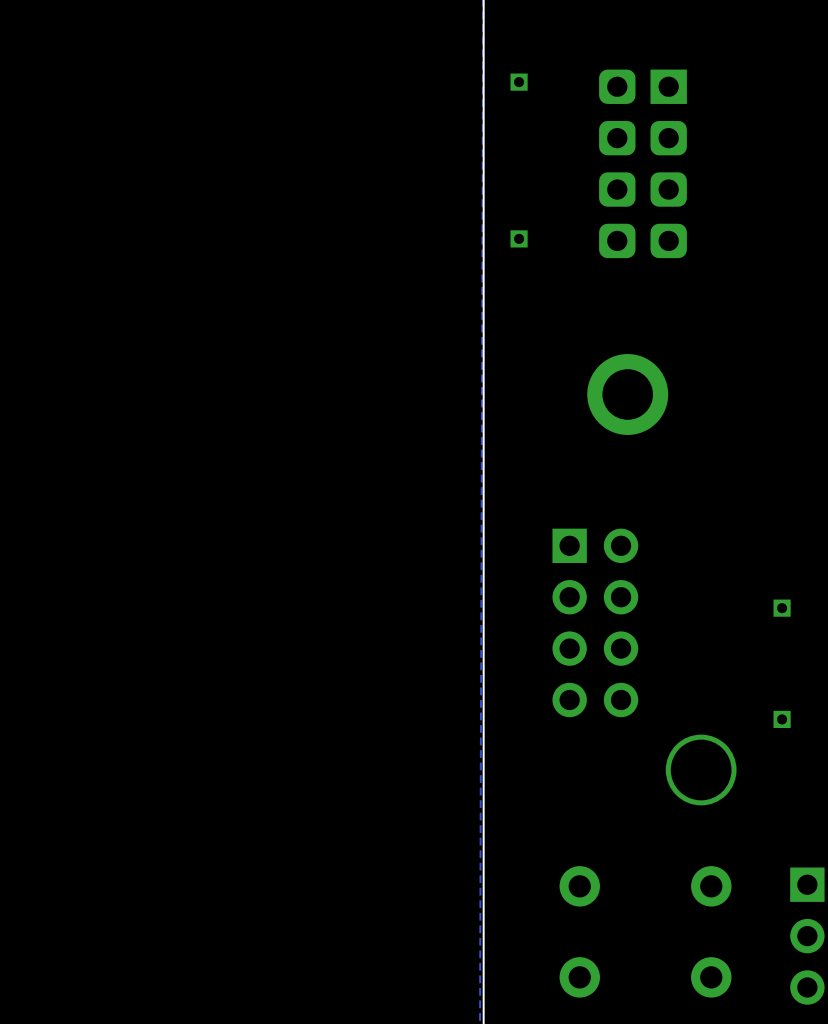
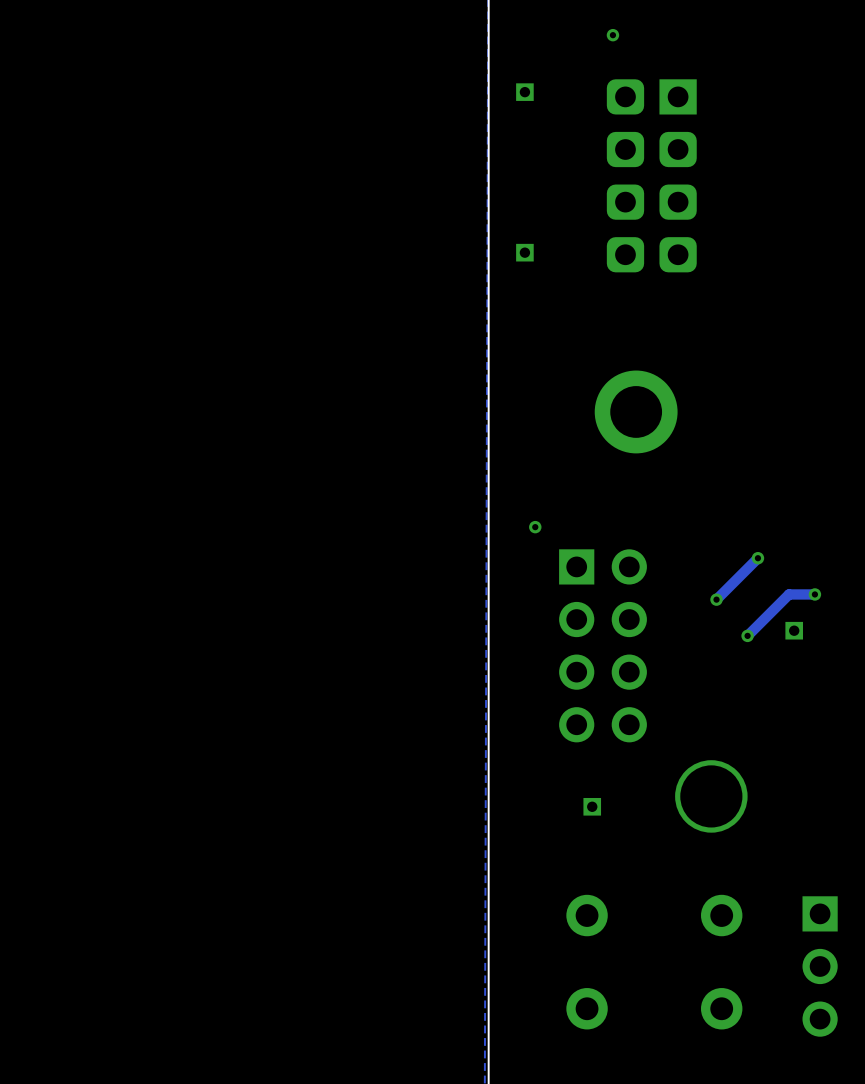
via: none -> (612, 35)
via: none -> (535, 527)
track: none -> (757, 558) (716, 599)
via: none -> (757, 558)
track: none -> (814, 594) (789, 594) (747, 635)
via: none -> (814, 594)
via: none -> (716, 599)
via: none -> (747, 635)
part position: (782, 719) -> (592, 806)

